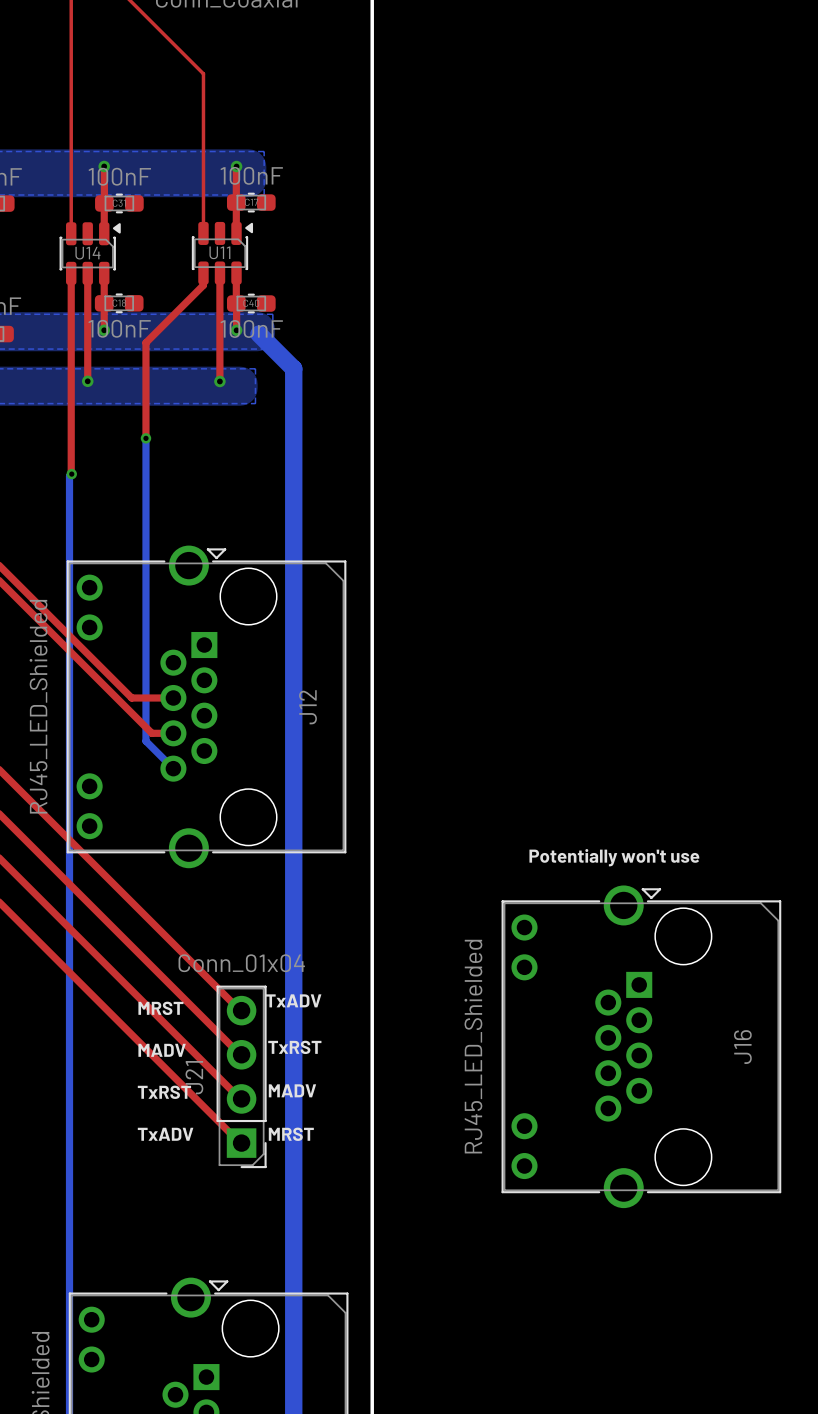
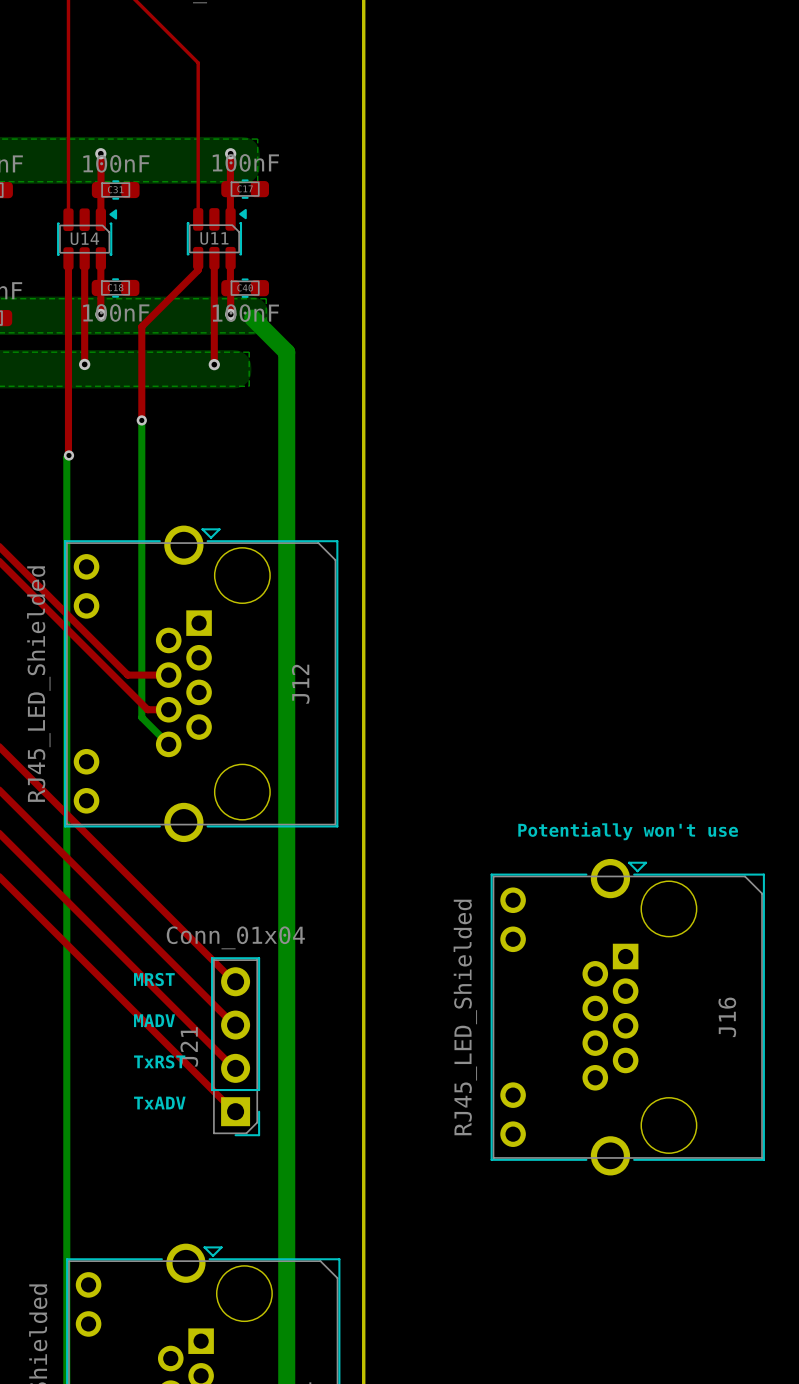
text: TxADV (293, 1000) -> none
text: TxRST (294, 1047) -> none
text: MADV (292, 1090) -> none
text: MRST (291, 1134) -> none

